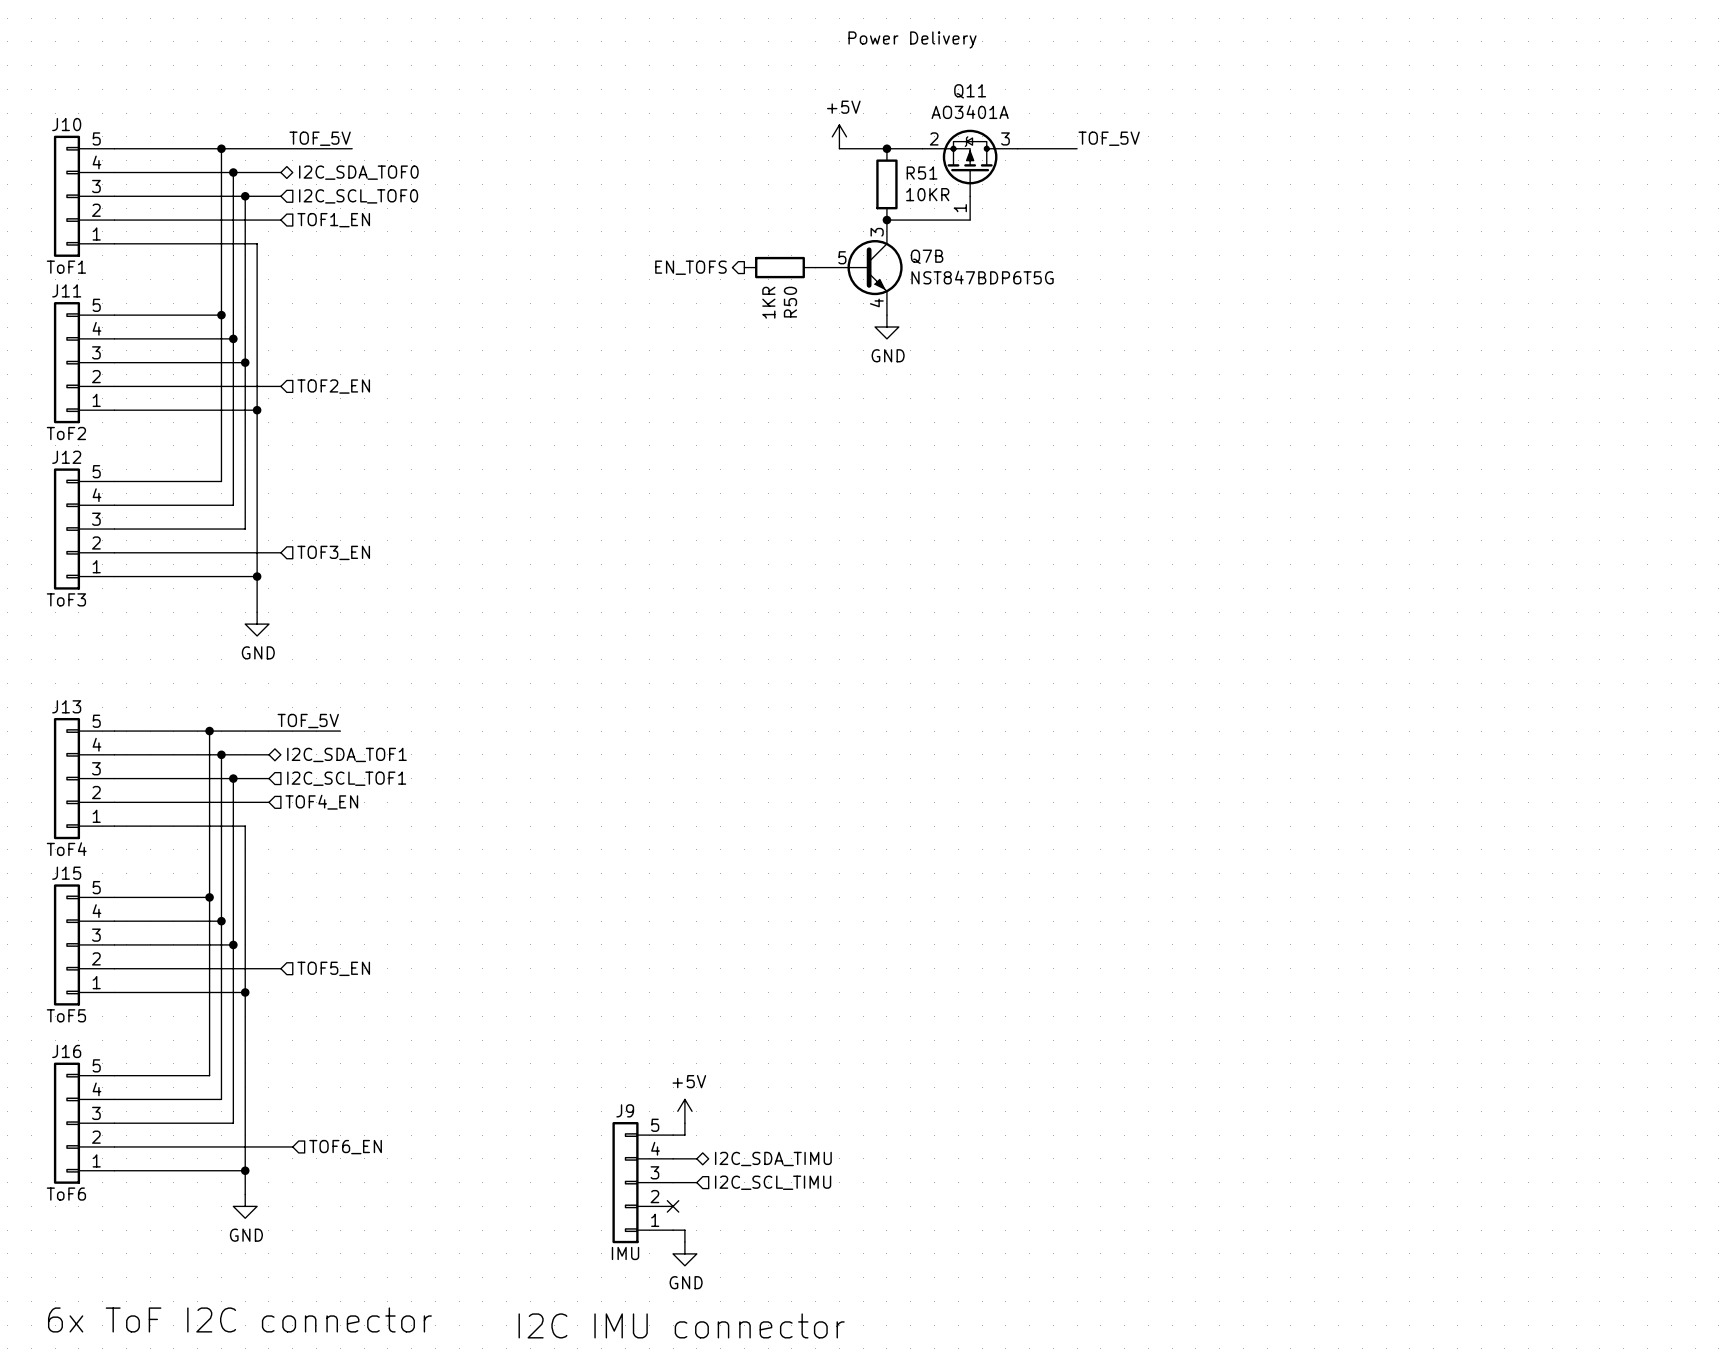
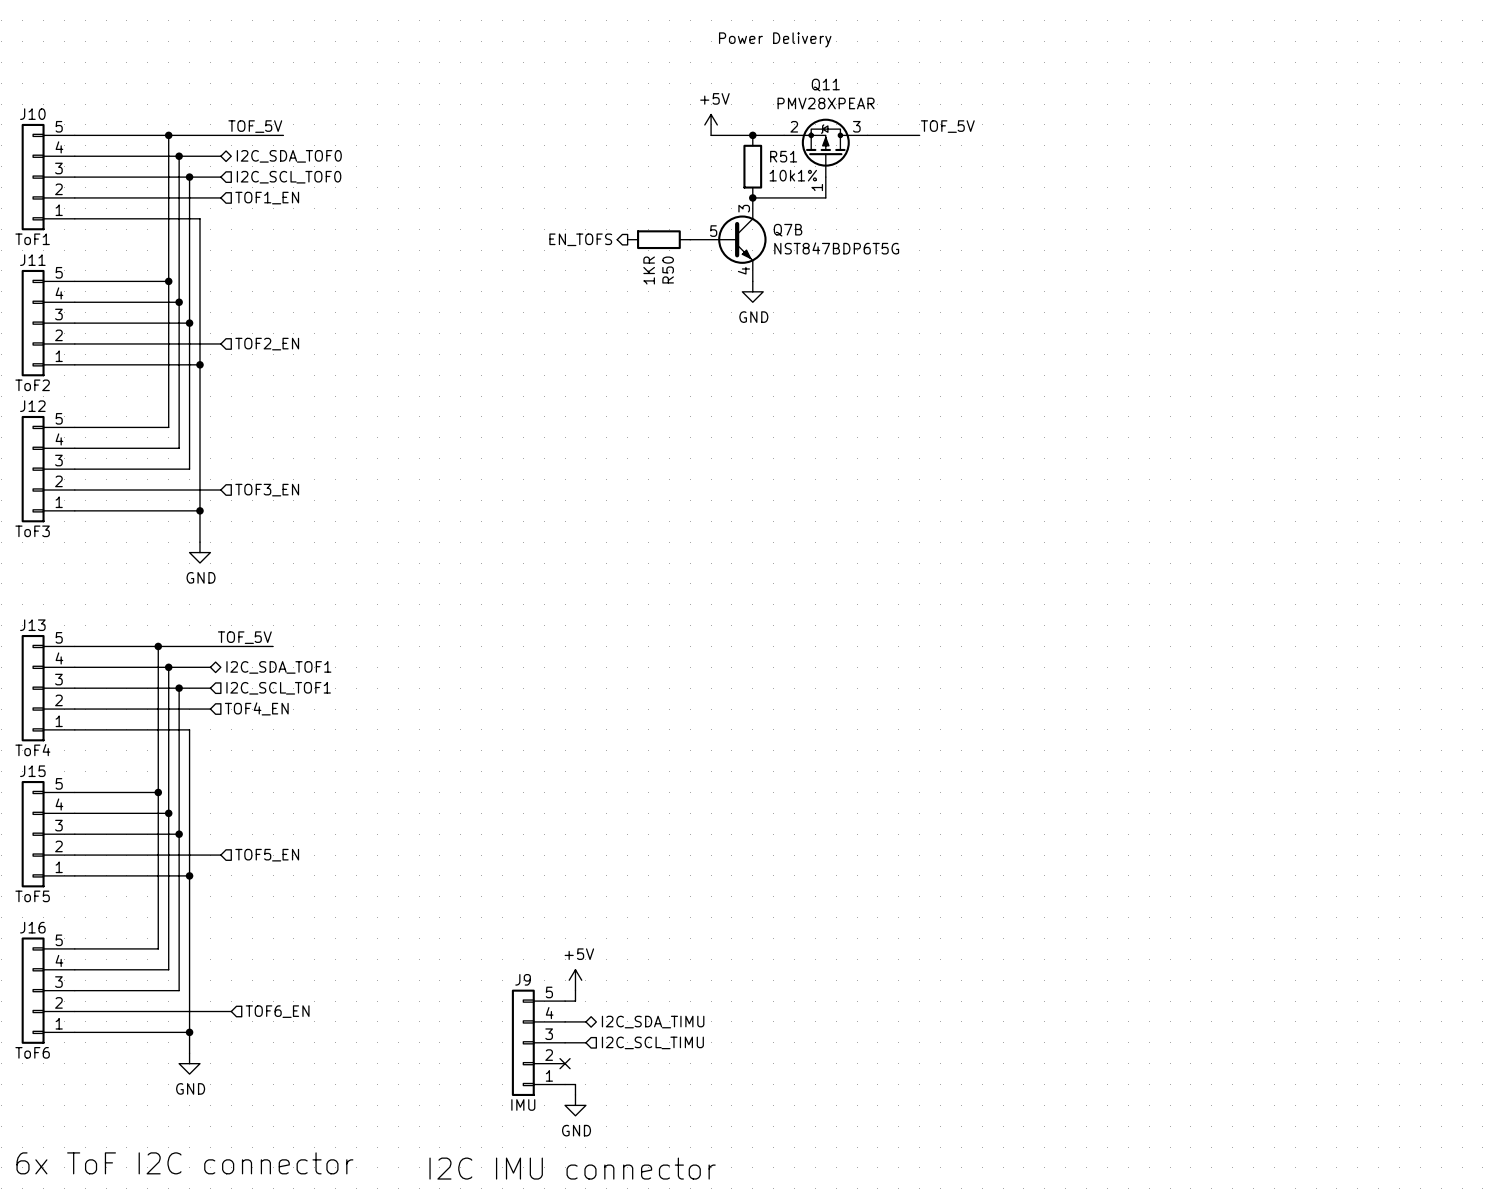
Q11 value: AO3401A (970, 112) -> PMV28XPEAR (826, 103)
R51 value: 10KR (927, 194) -> 10k1% (793, 175)

